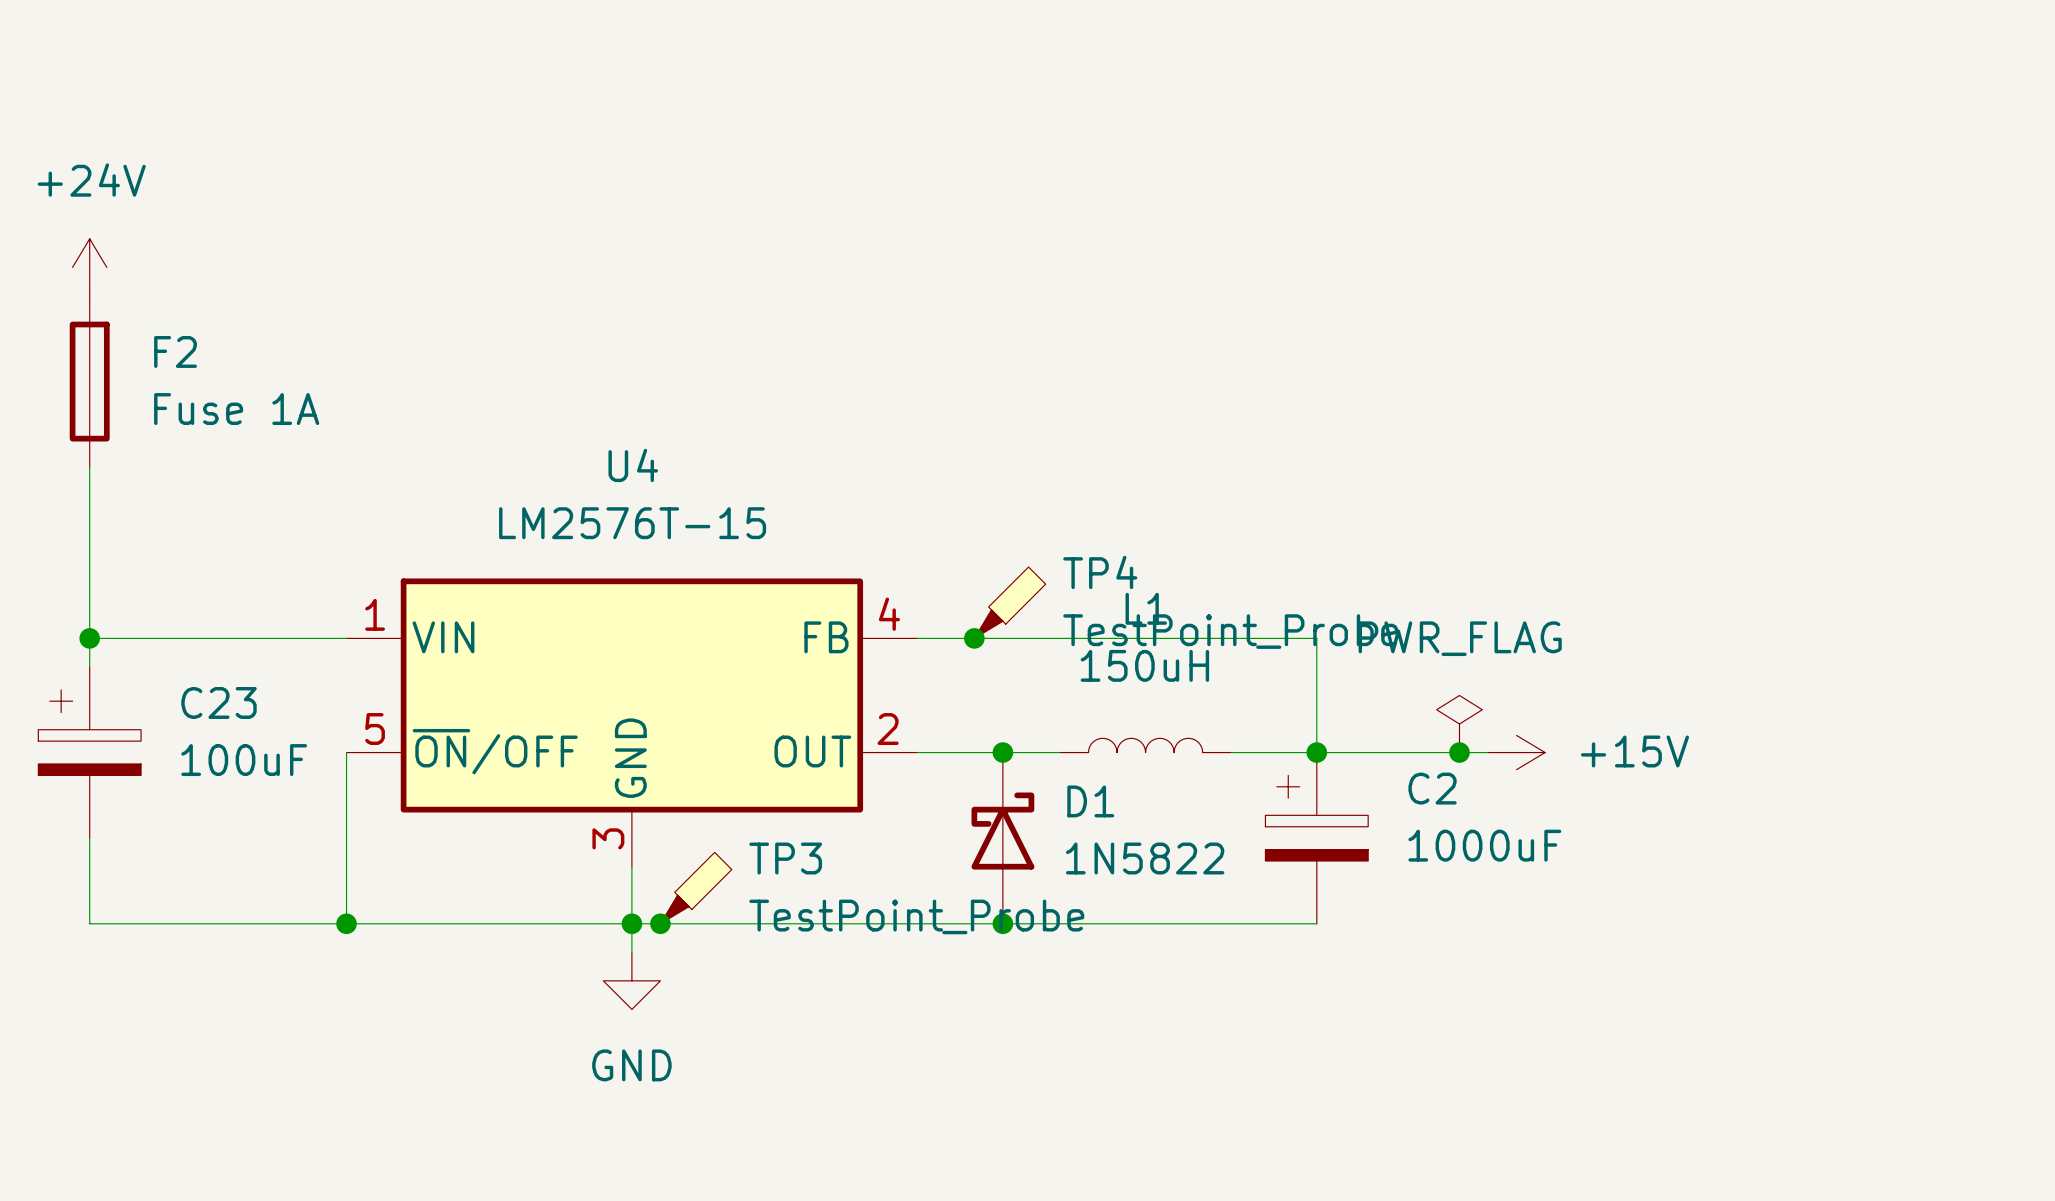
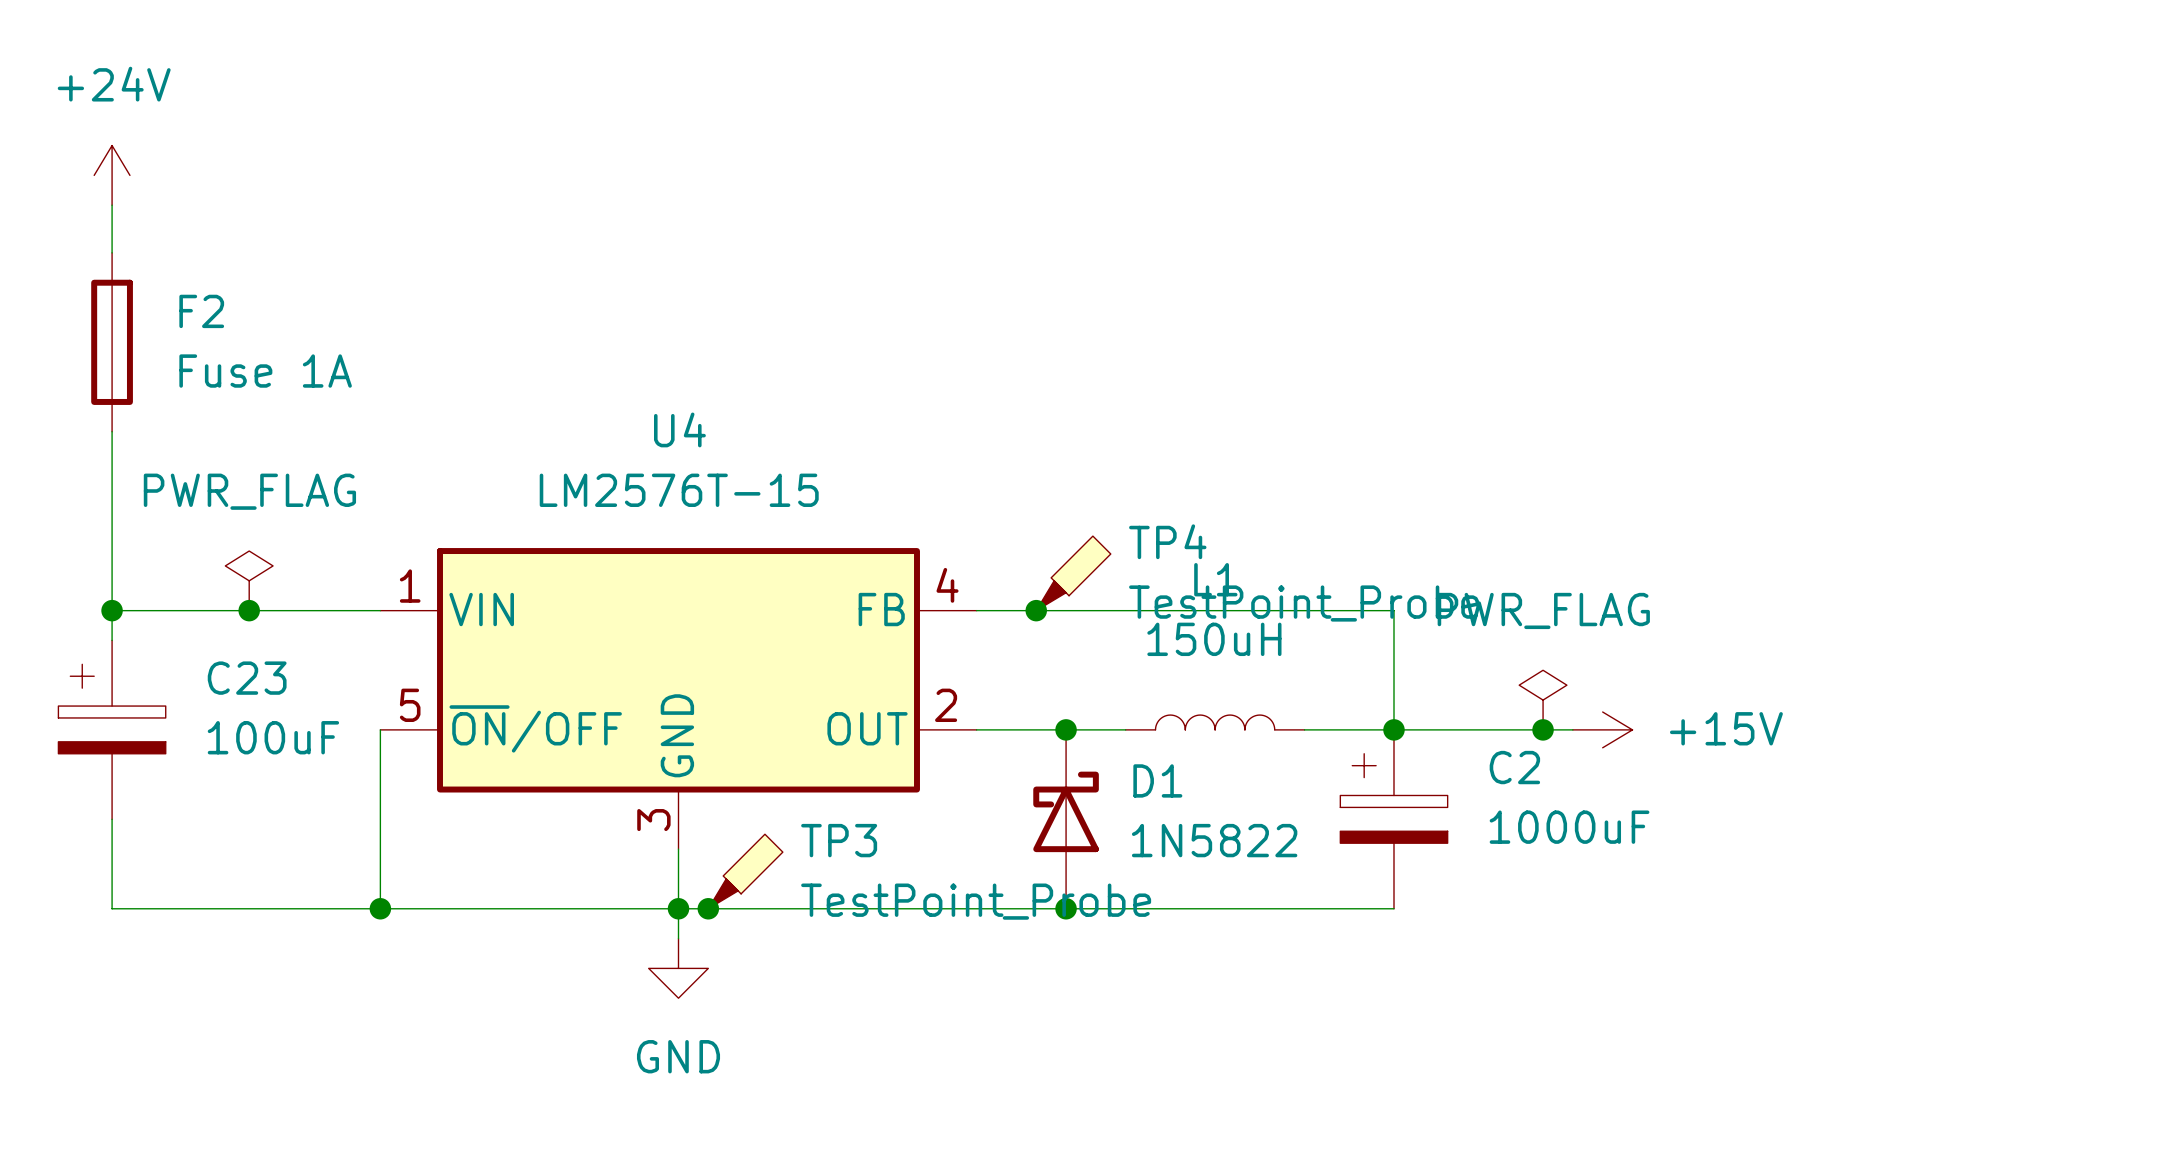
power symbol position: +24V (89, 267) -> +24V (112, 175)
power symbol: none -> PWR_FLAG (249, 580)
junction: none -> (249, 610)

